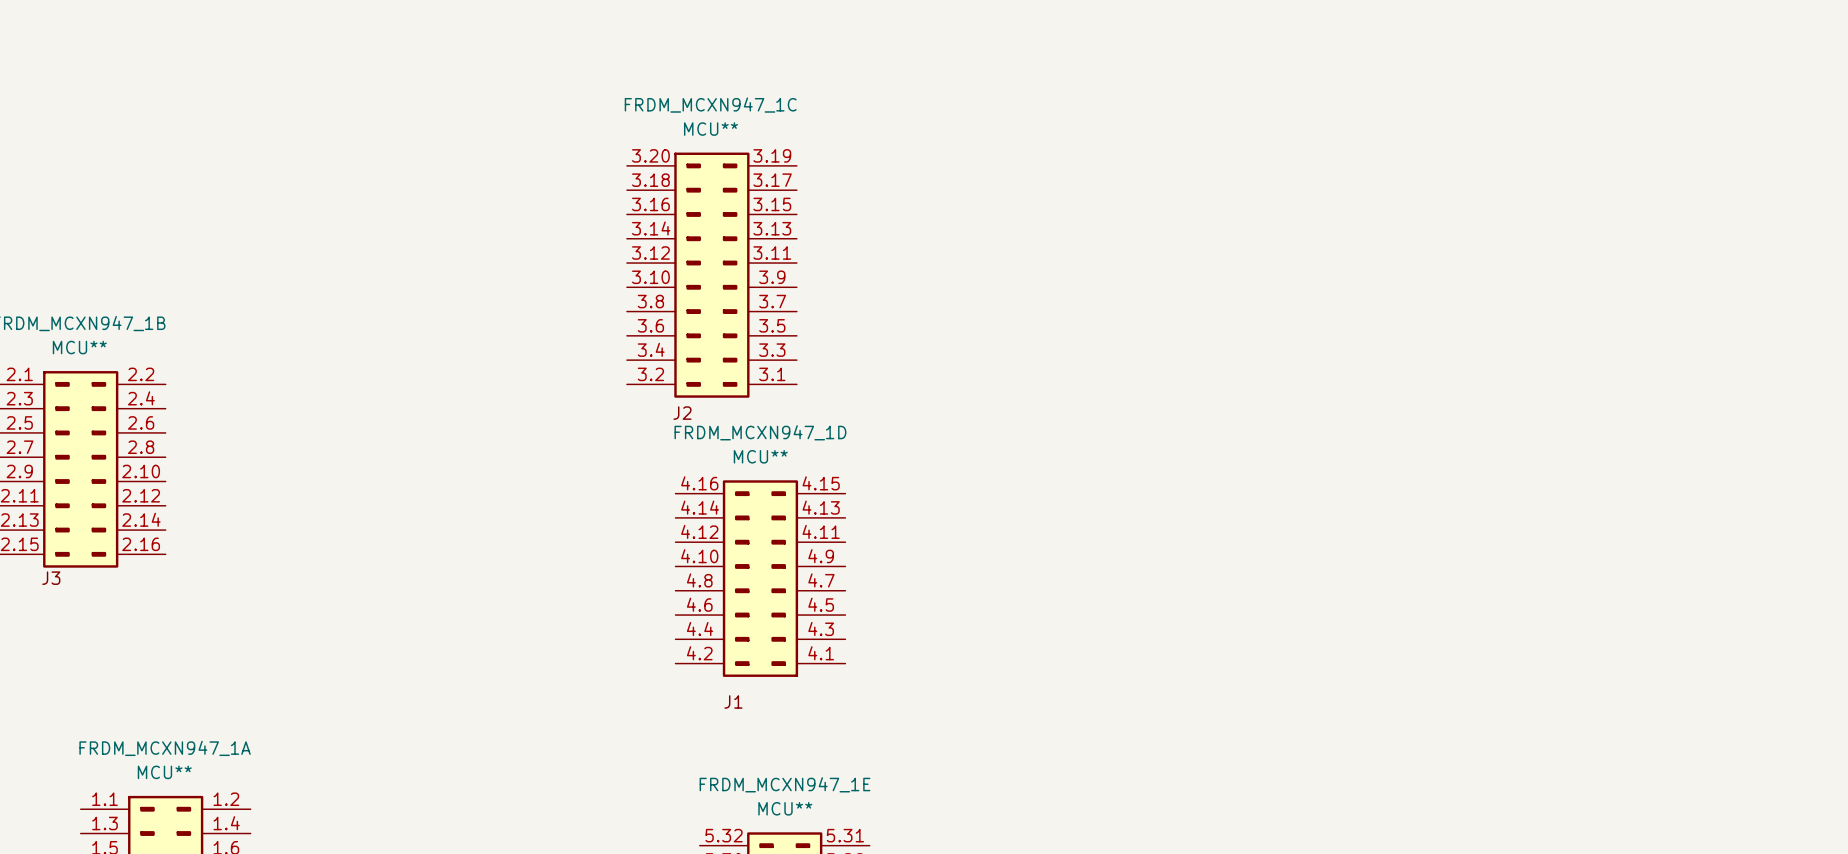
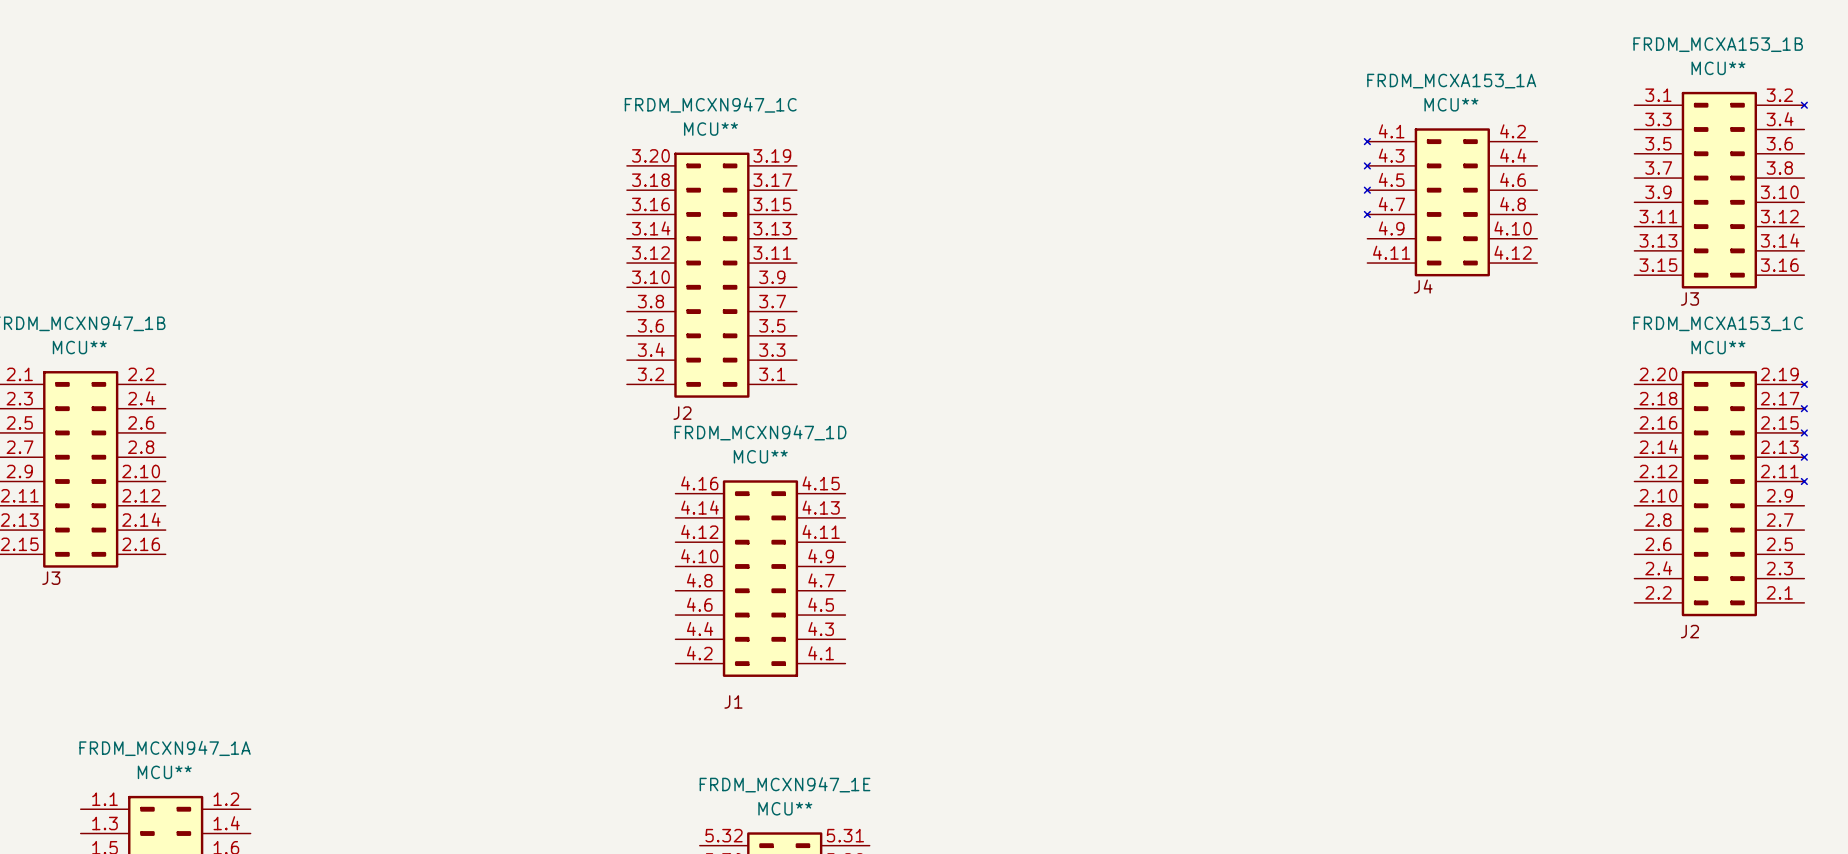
FRDM_MCXA153_1B: none -> MCU** (1720, 190)
FRDM_MCXA153_1A: none -> MCU** (1450, 202)
FRDM_MCXA153_1C: none -> MCU** (1720, 493)

